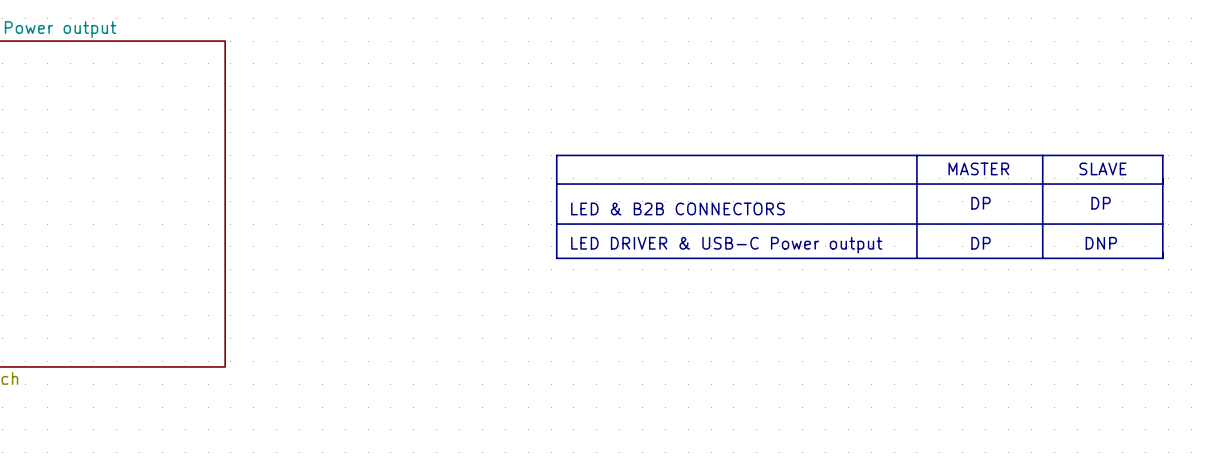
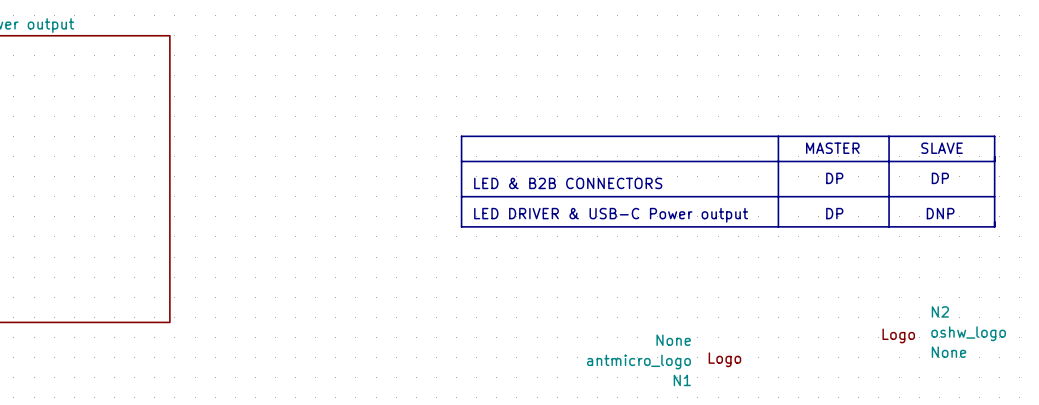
N2: none -> oshw_logo (944, 332)
N1: none -> antmicro_logo (664, 360)

